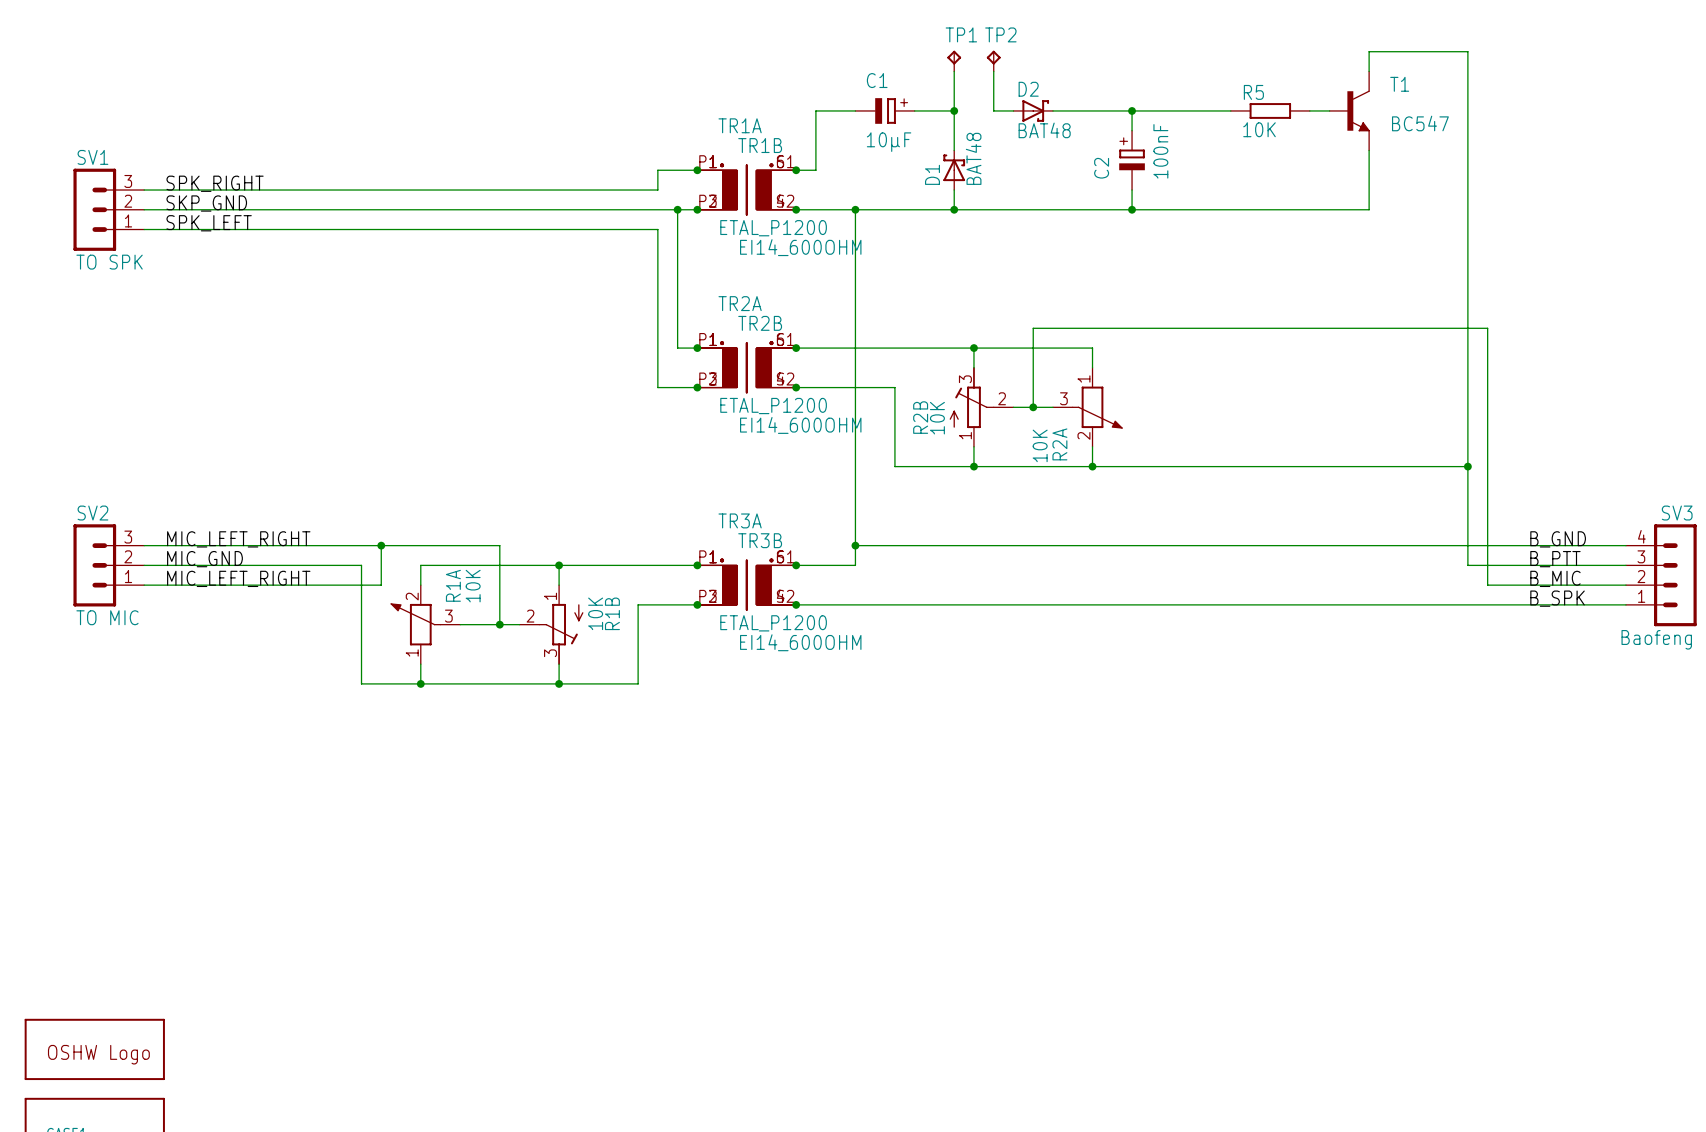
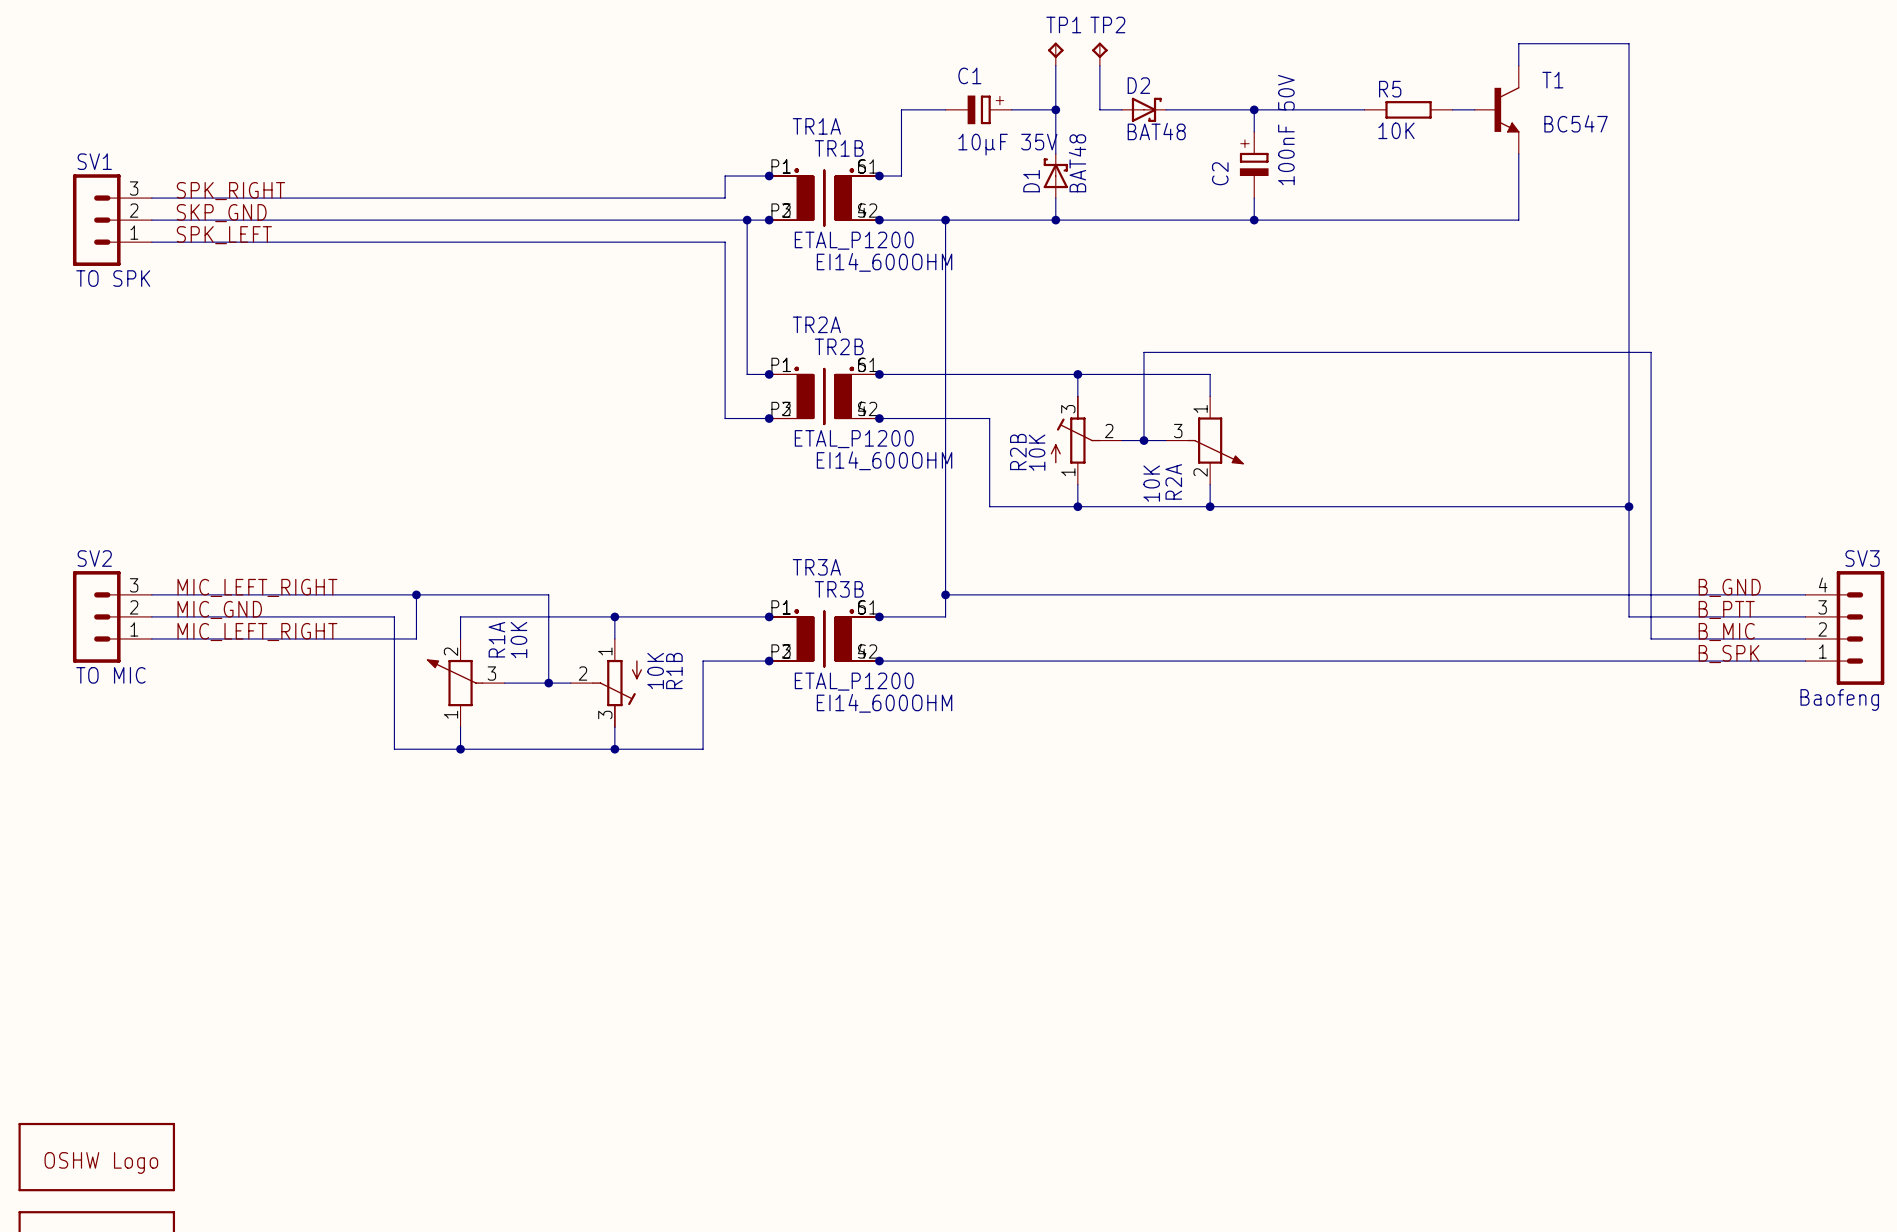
C1 value: 10µF (889, 142) -> 10µF 35V (1007, 144)
C2 value: 100nF (1160, 151) -> 100nF 50V (1286, 130)

